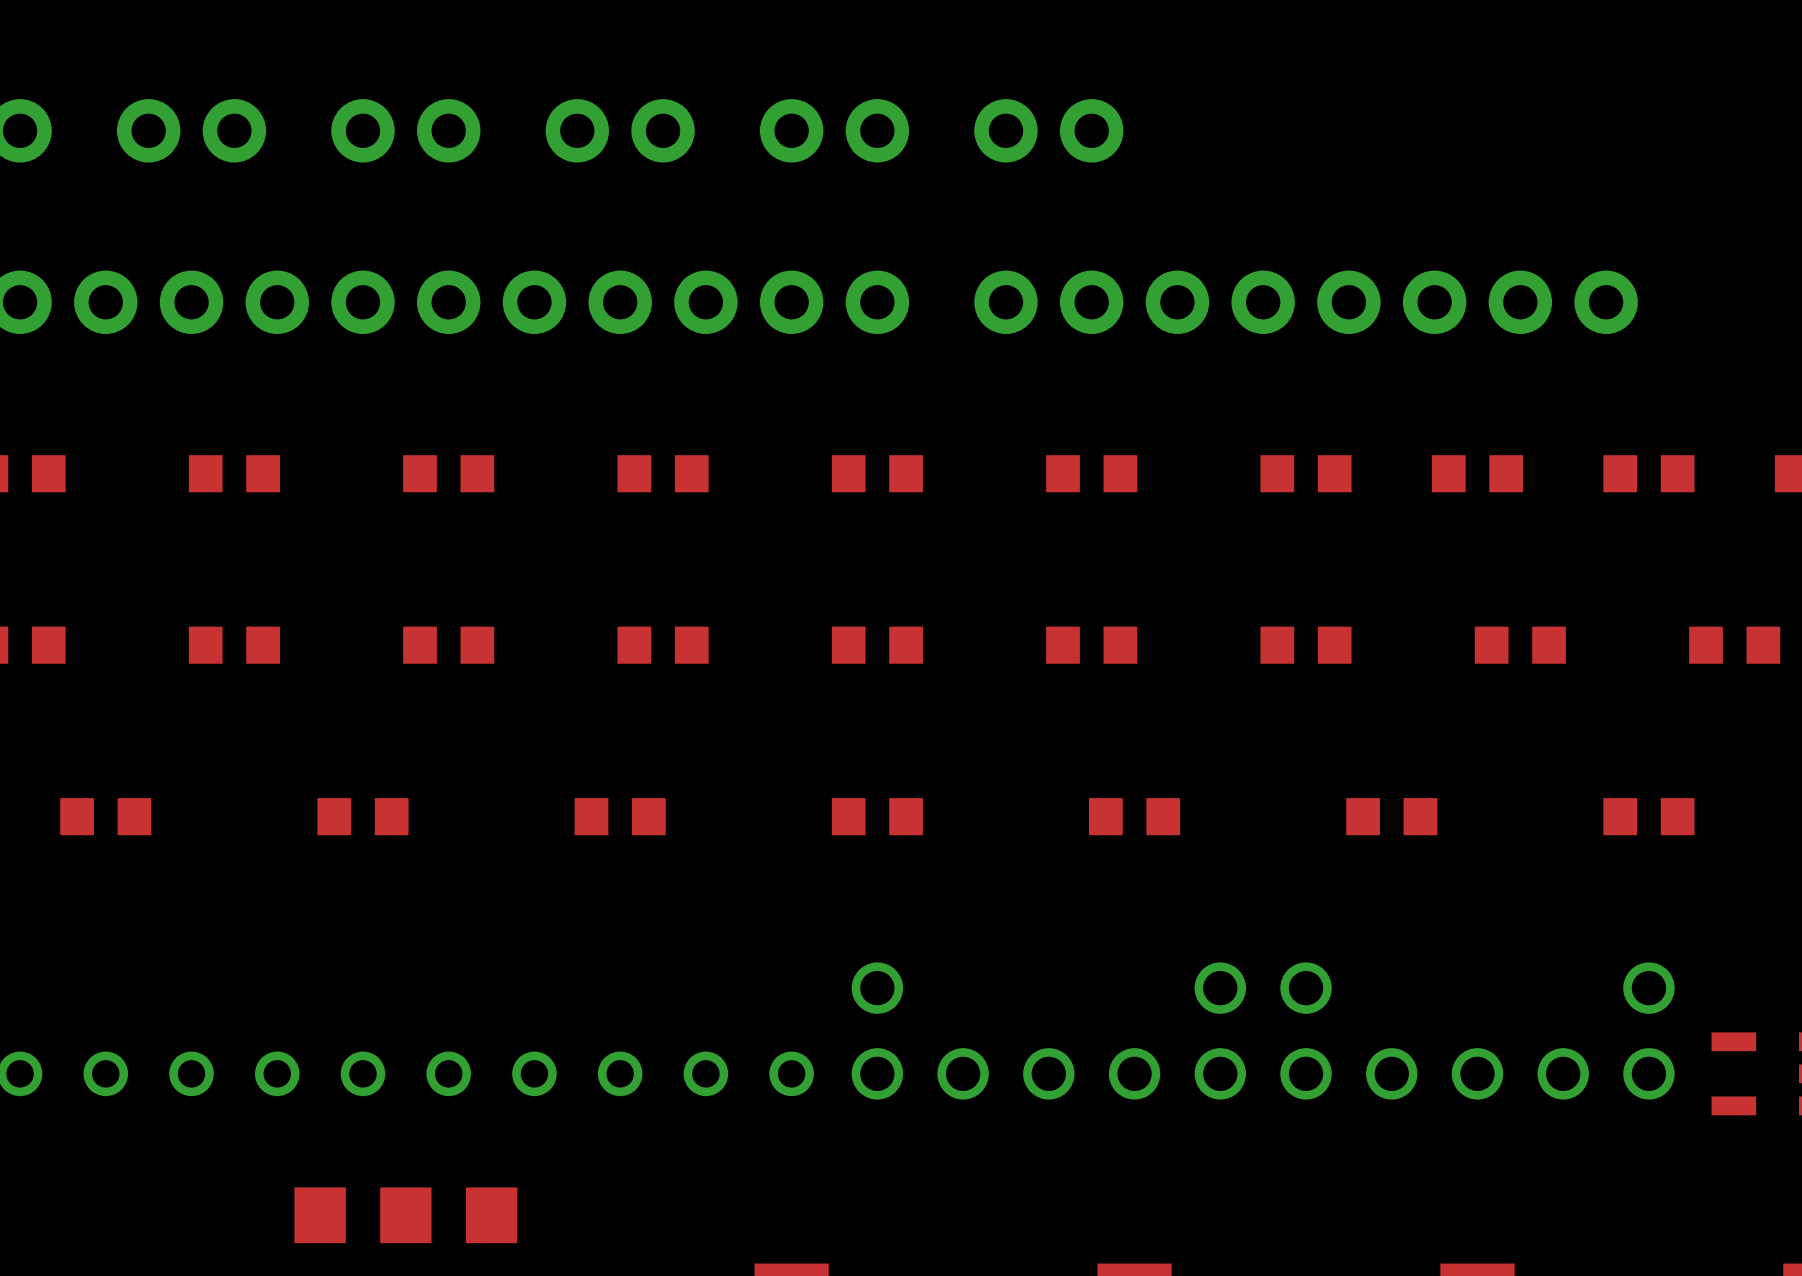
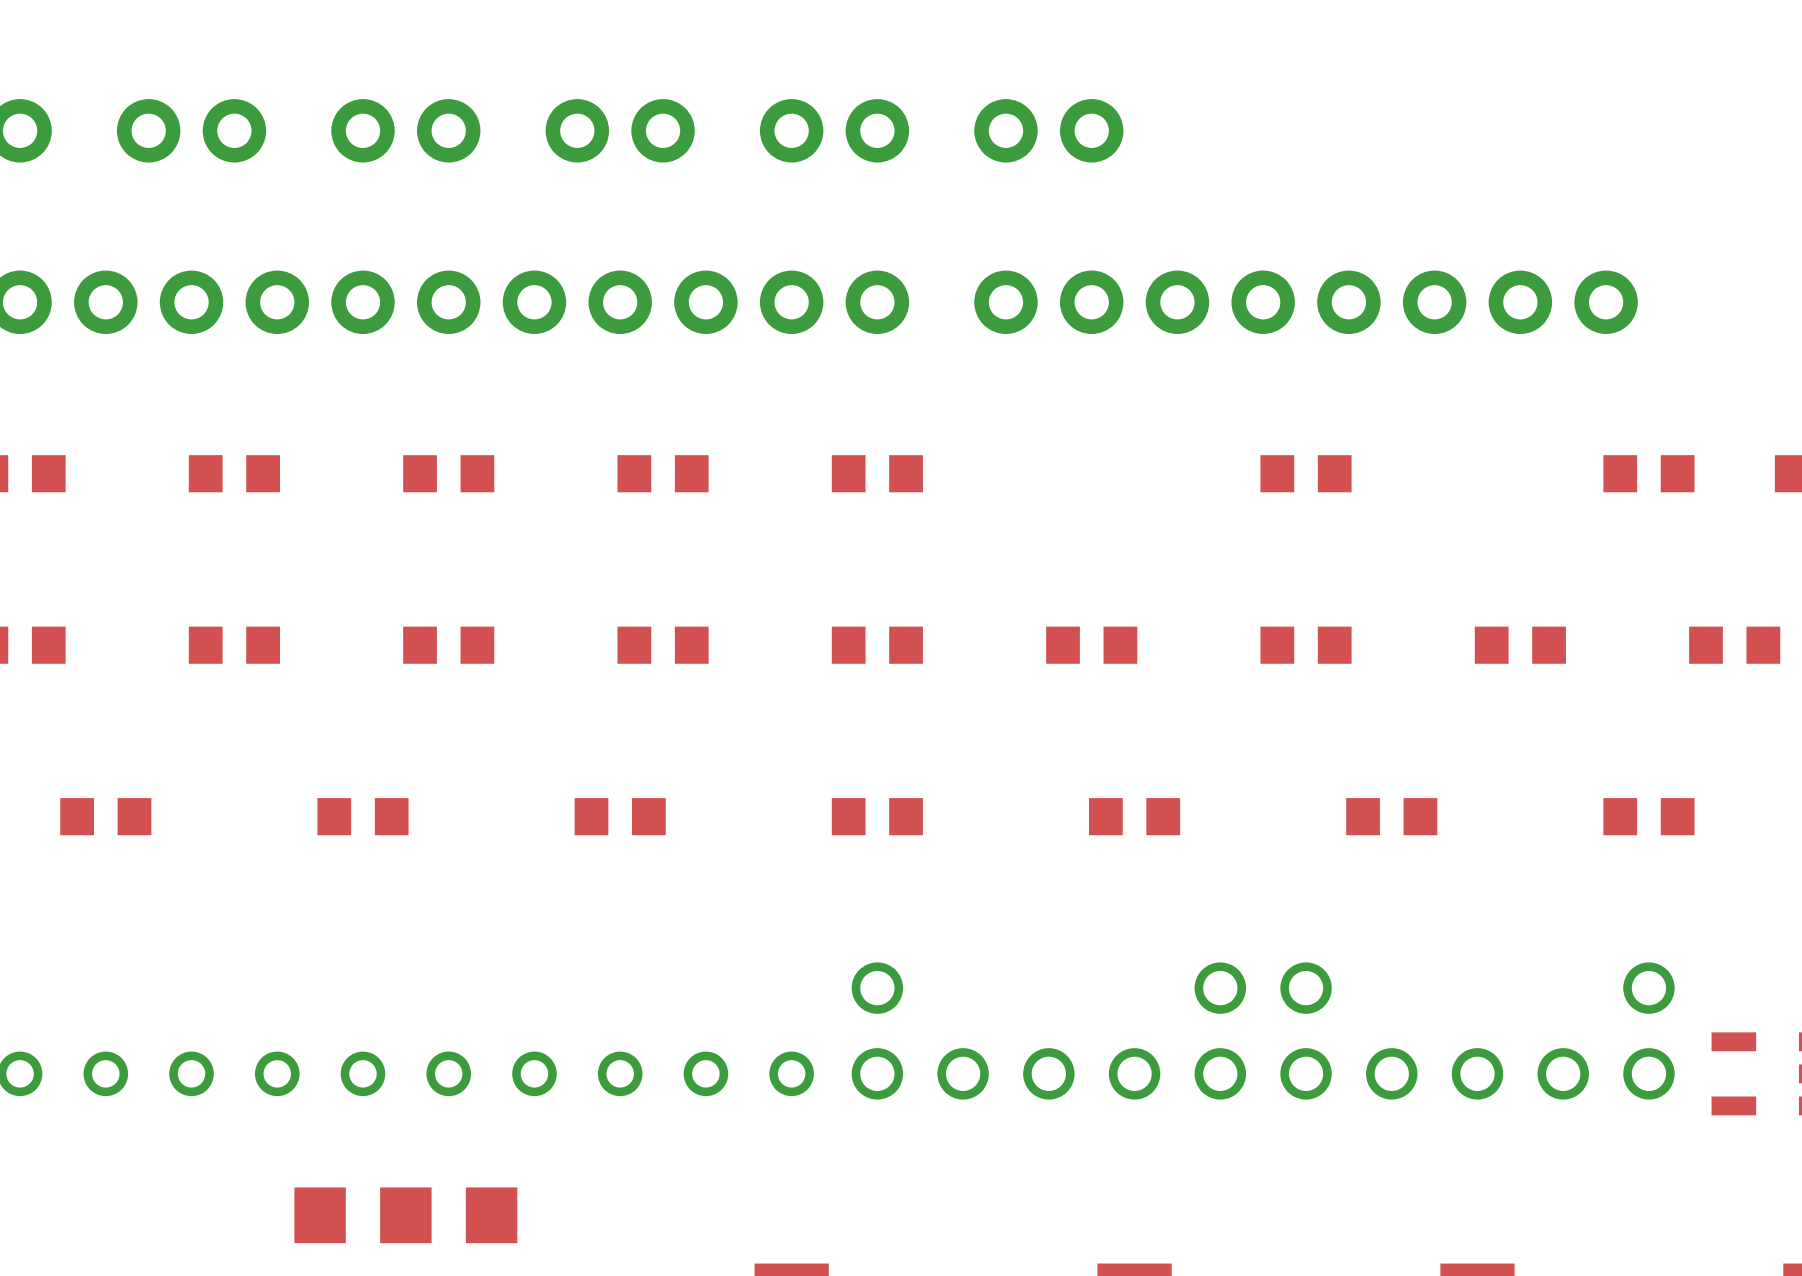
part: (1091, 473) -> none
part: (1477, 473) -> none

